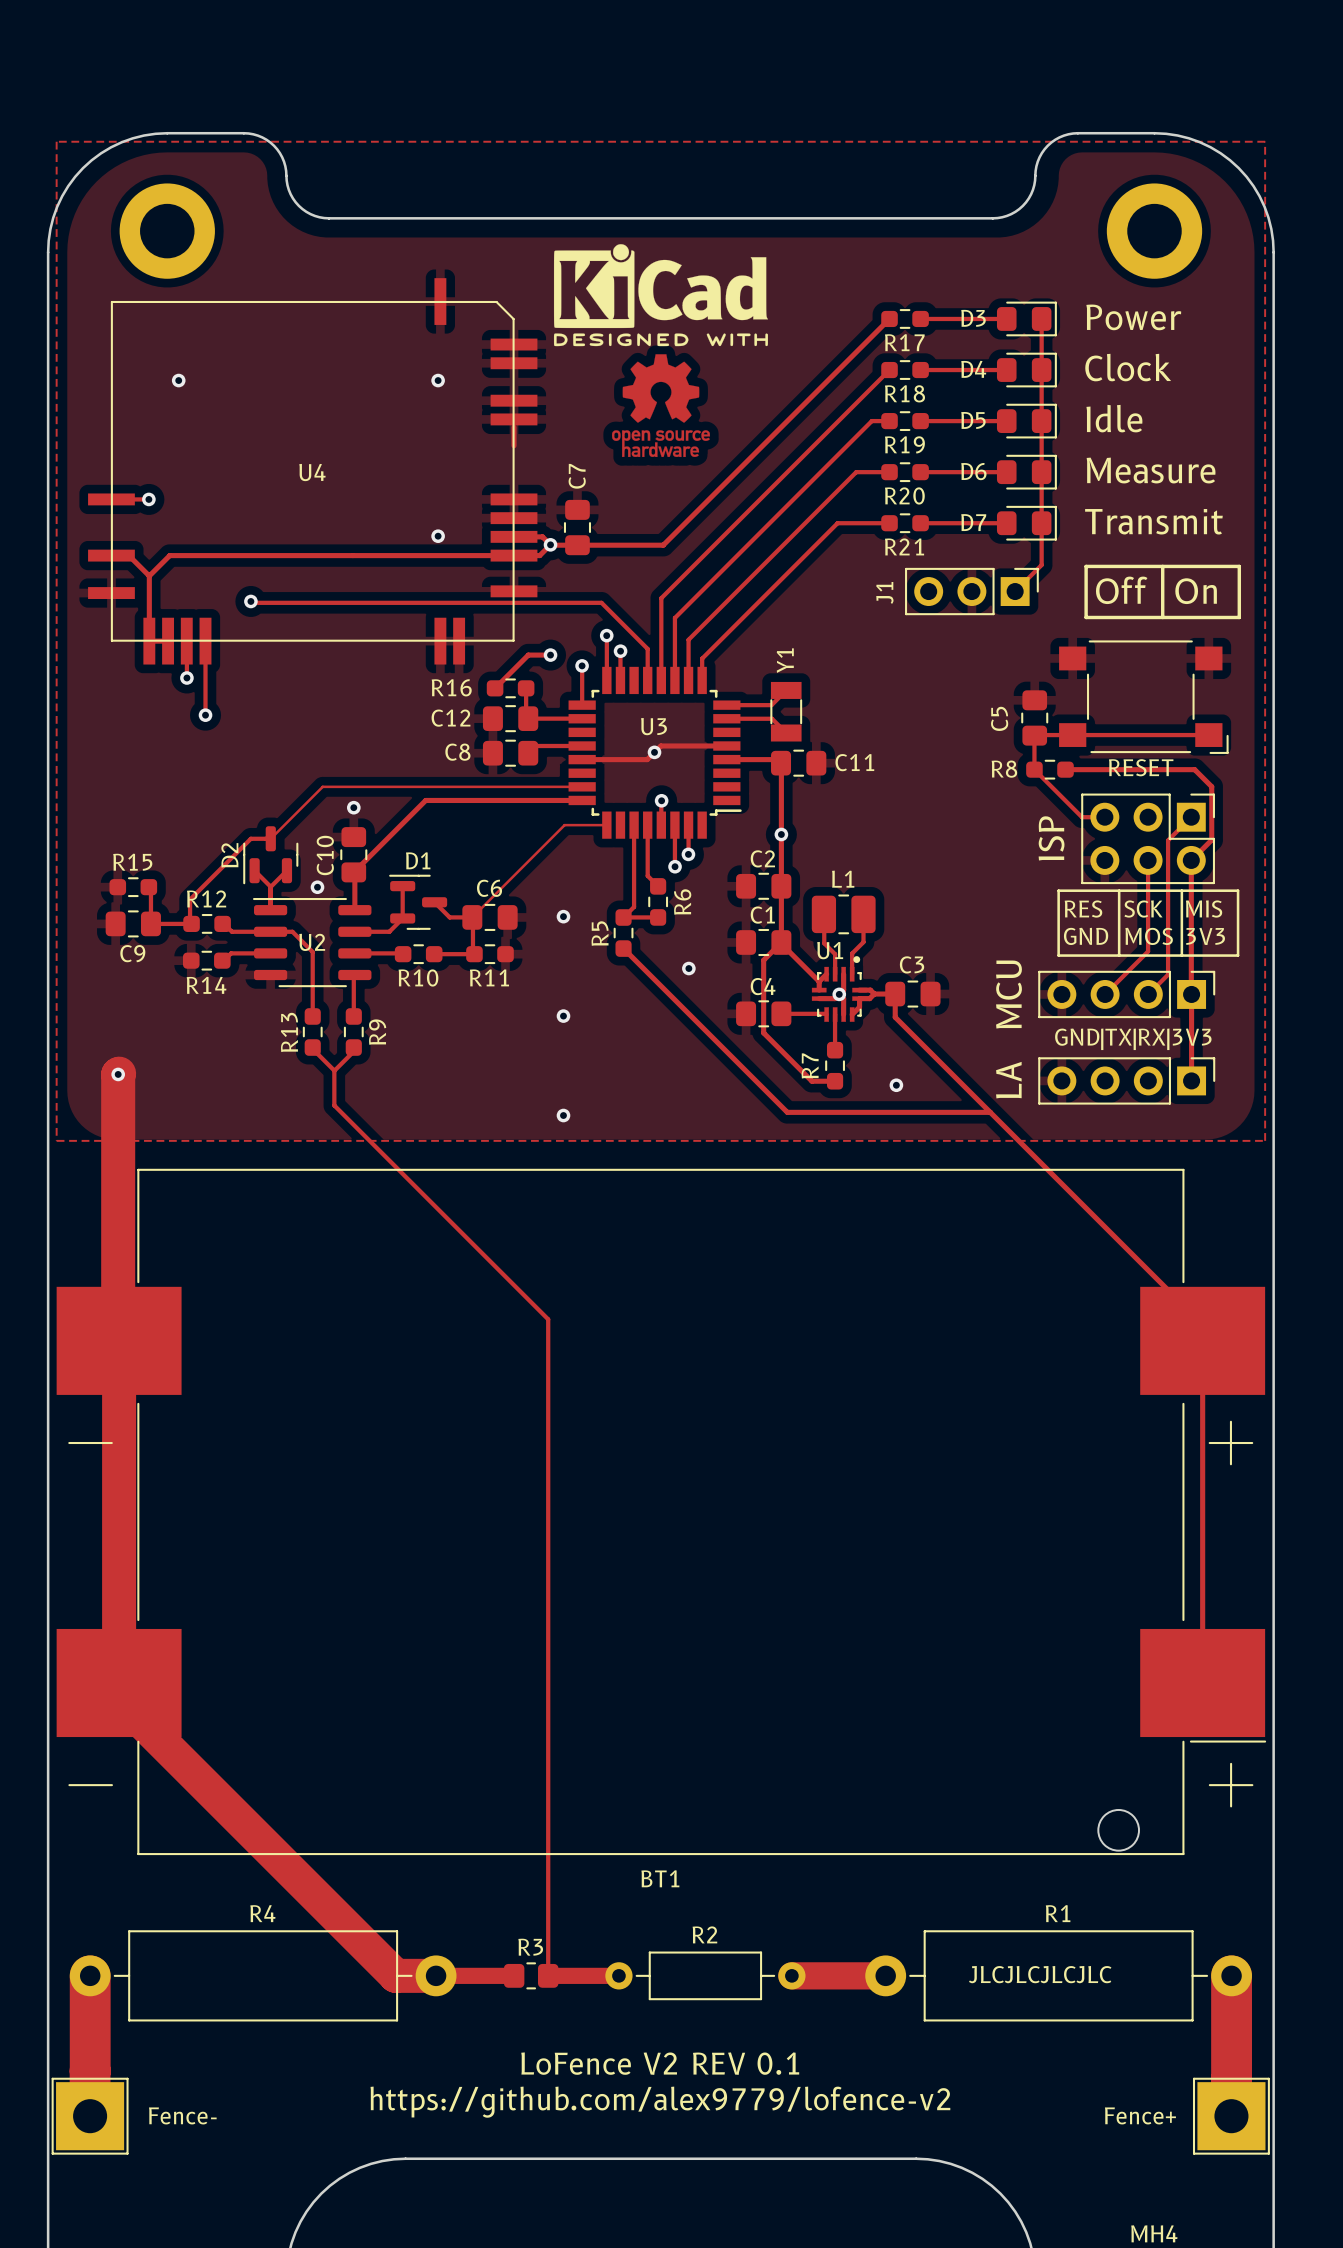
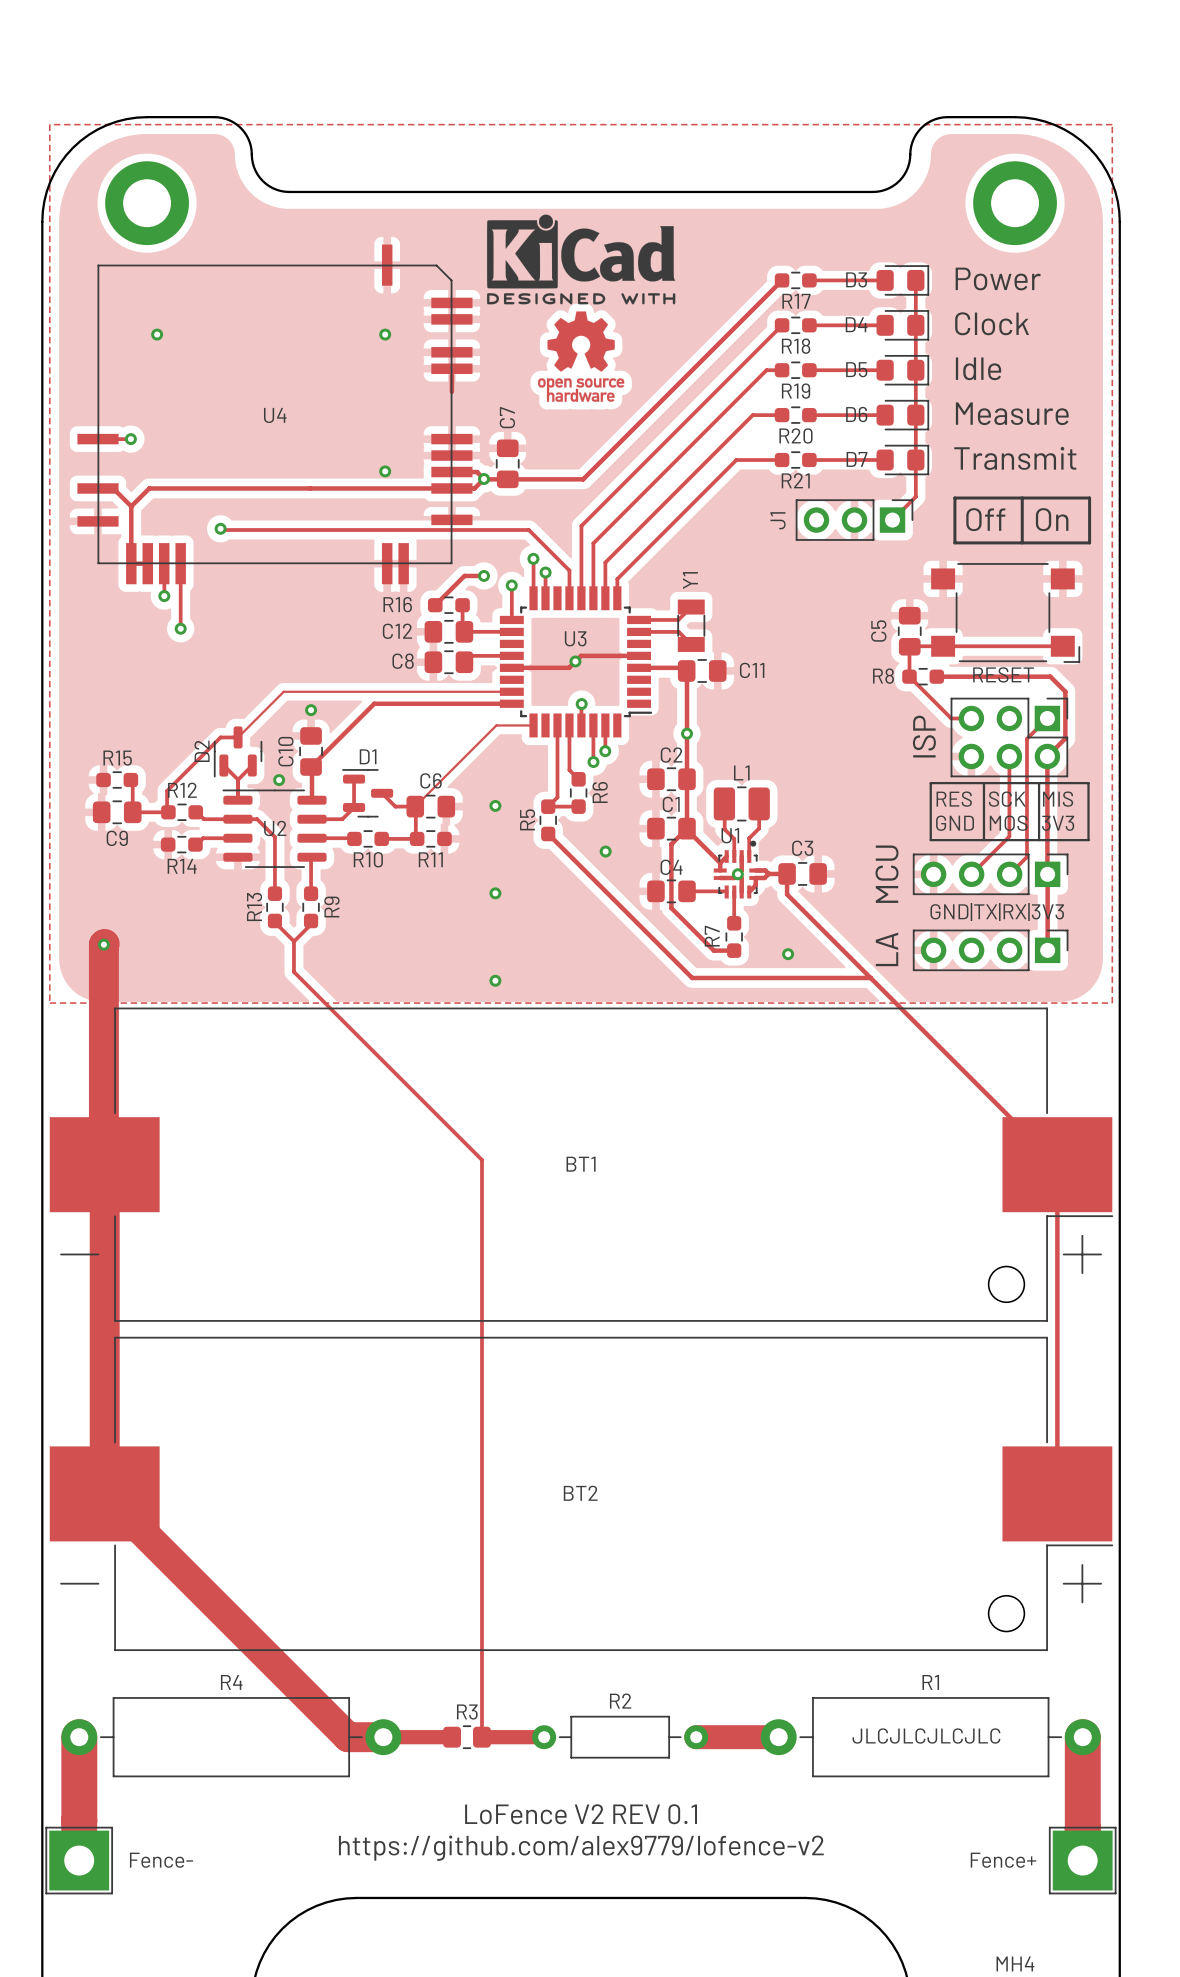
BT1 footprint: [56, 1168, 1267, 1856] -> [49, 1007, 1114, 1322]
BT2: none -> (581, 1493)
BT1 name position: BT1 (660, 1878) -> BT1 (581, 1164)

